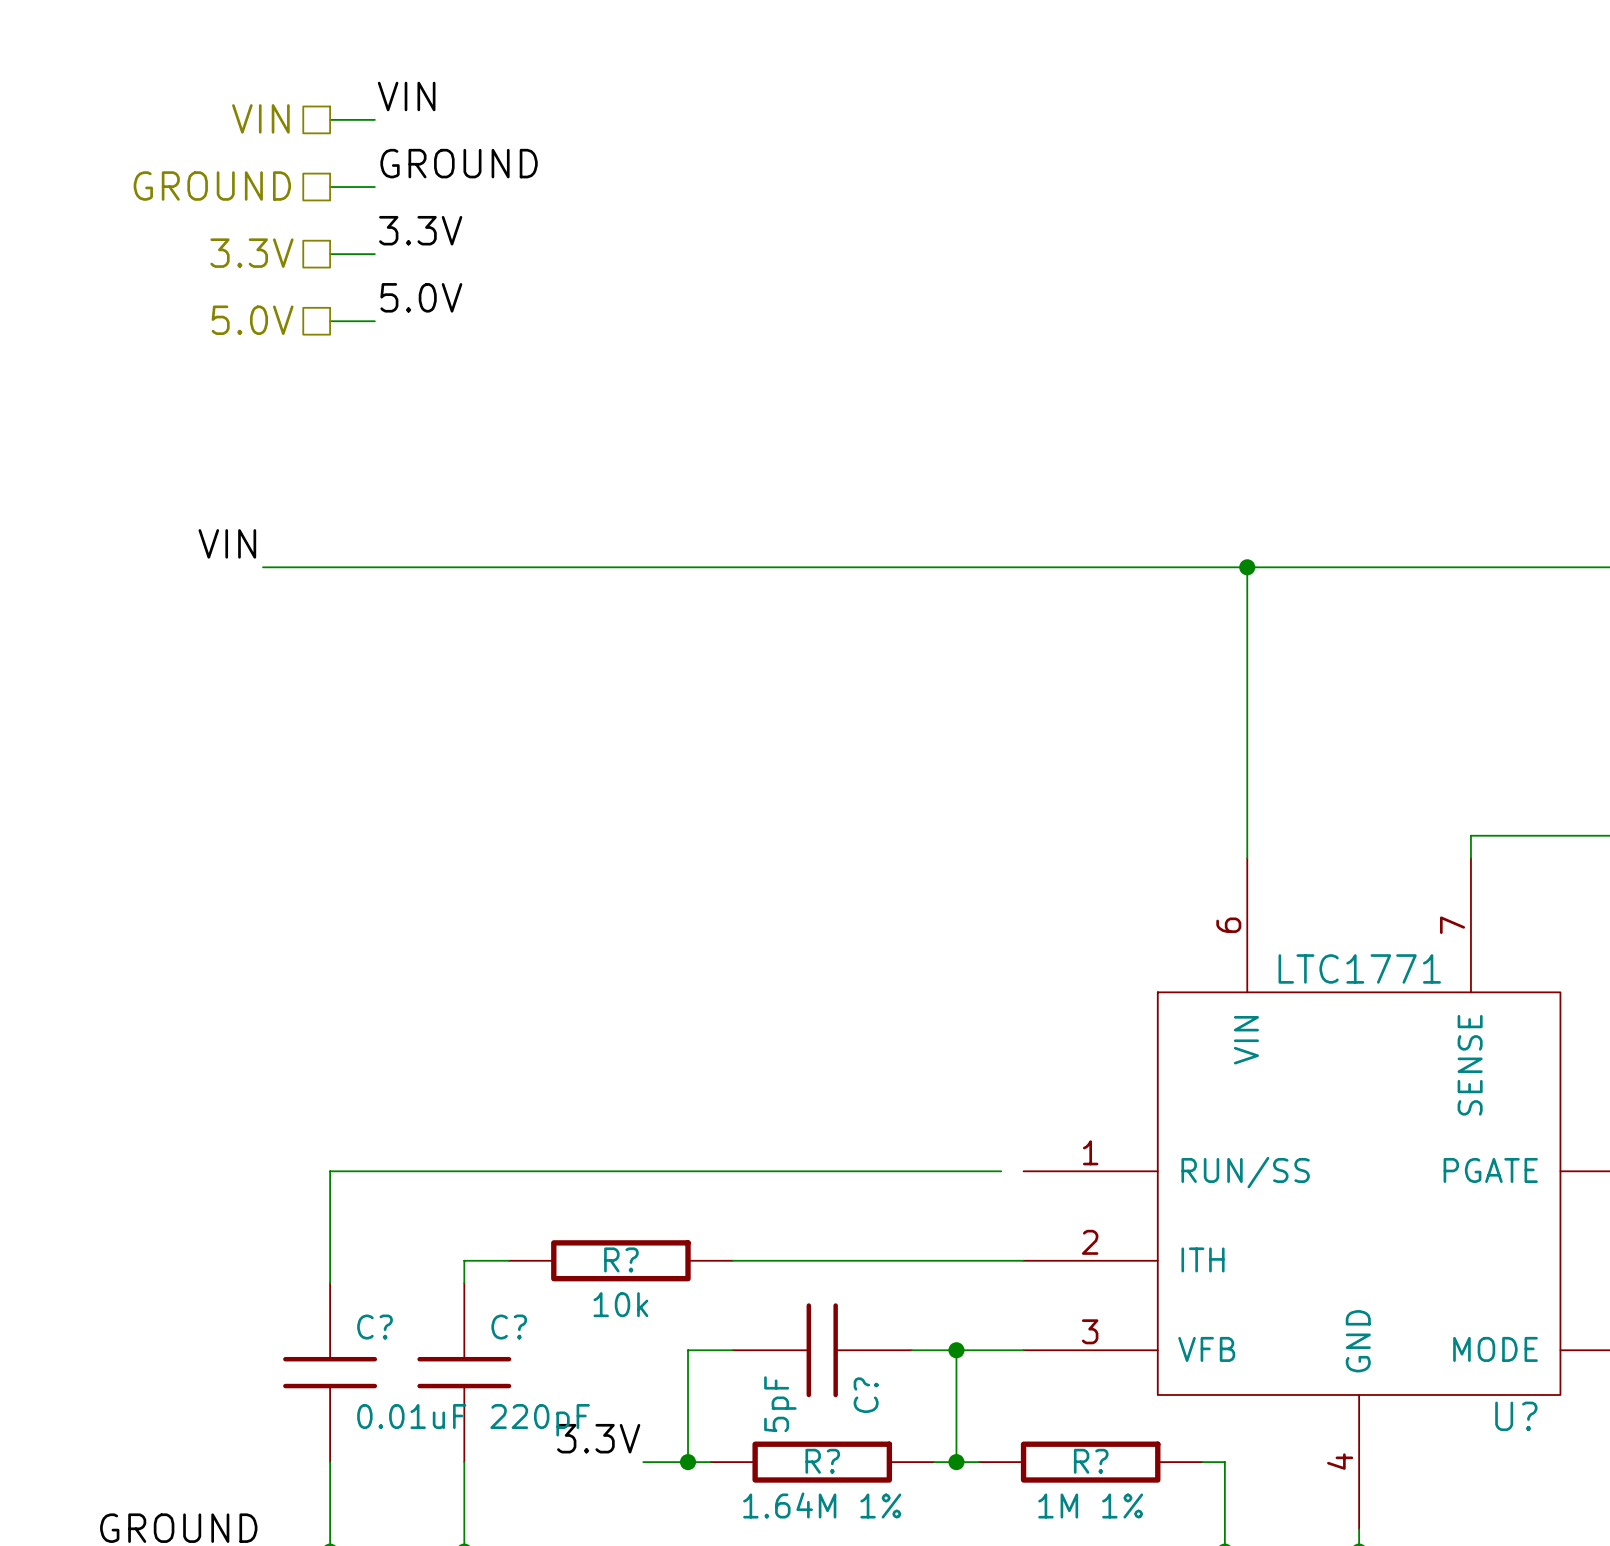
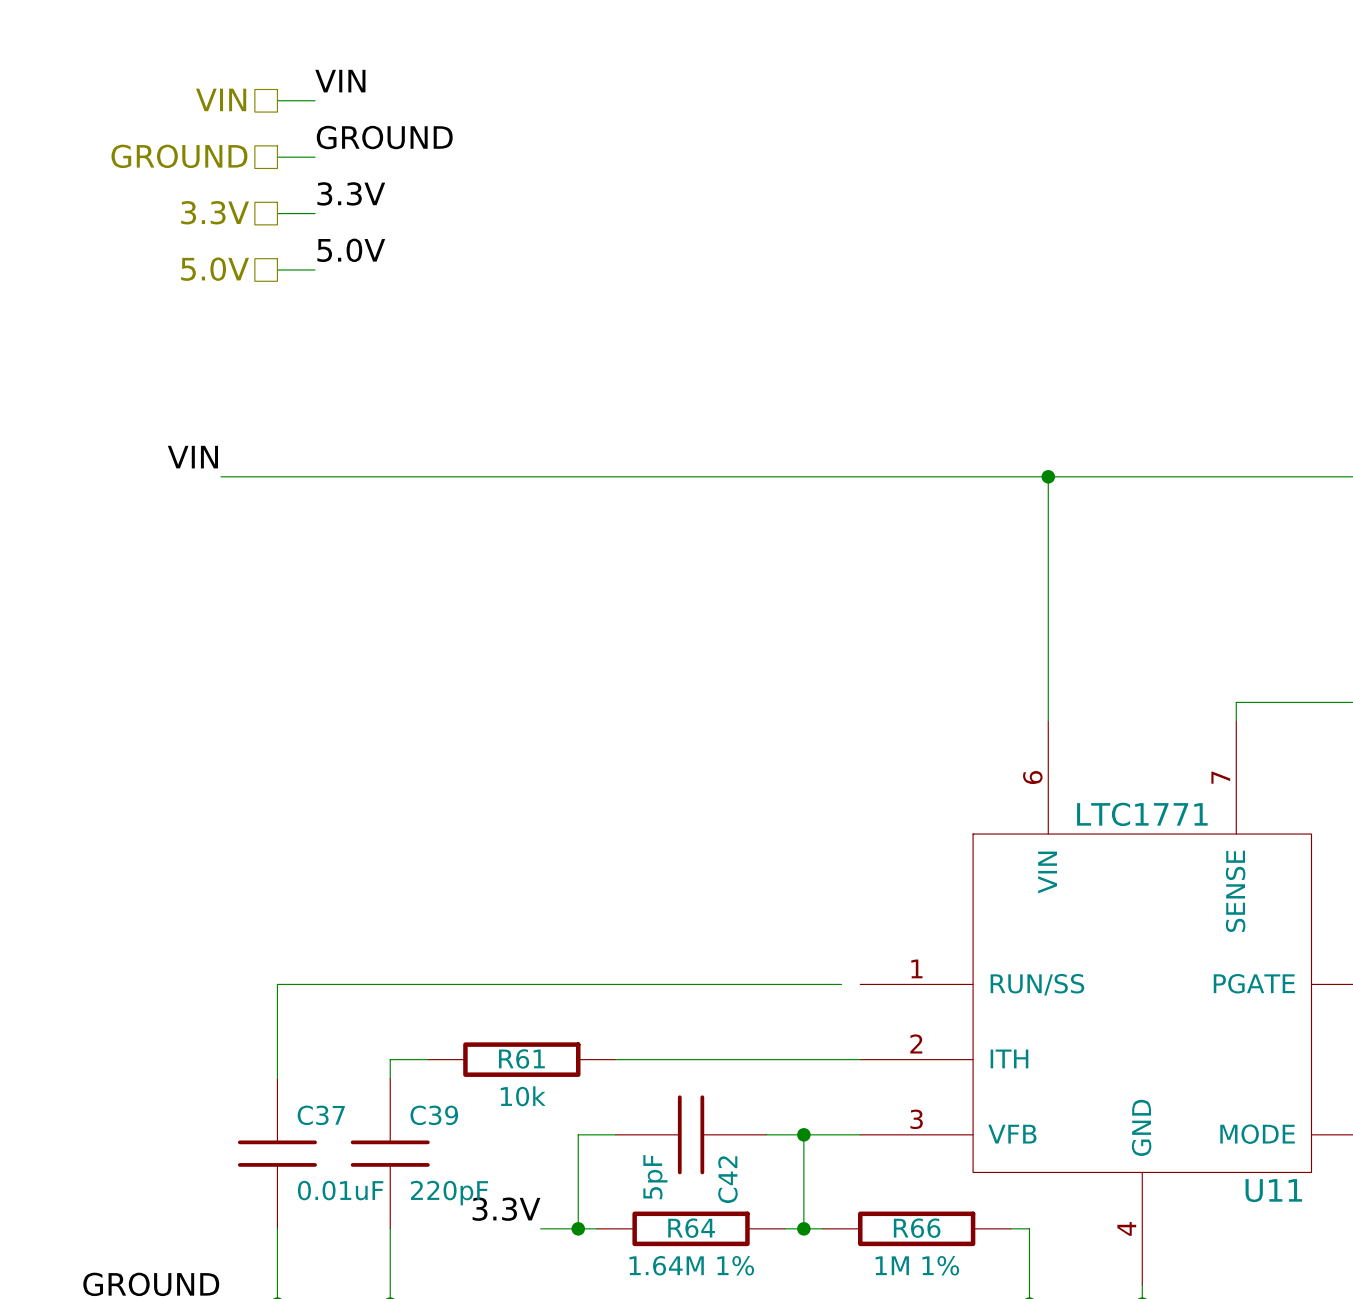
R? name: R? (621, 1259) -> R61 (521, 1058)
C? name: C? (375, 1327) -> C37 (321, 1115)
C? name: C? (509, 1327) -> C39 (434, 1115)
C? name: C? (866, 1395) -> C42 (727, 1179)
U? name: U? (1516, 1416) -> U11 (1273, 1190)
R? name: R? (822, 1461) -> R64 (691, 1228)
R? name: R? (1091, 1461) -> R66 (917, 1228)

